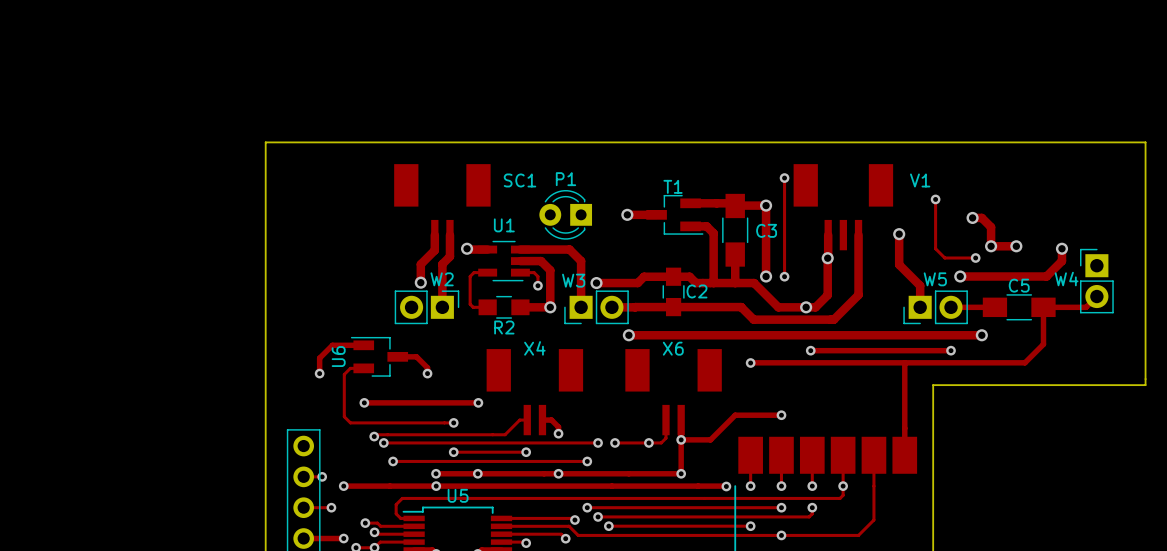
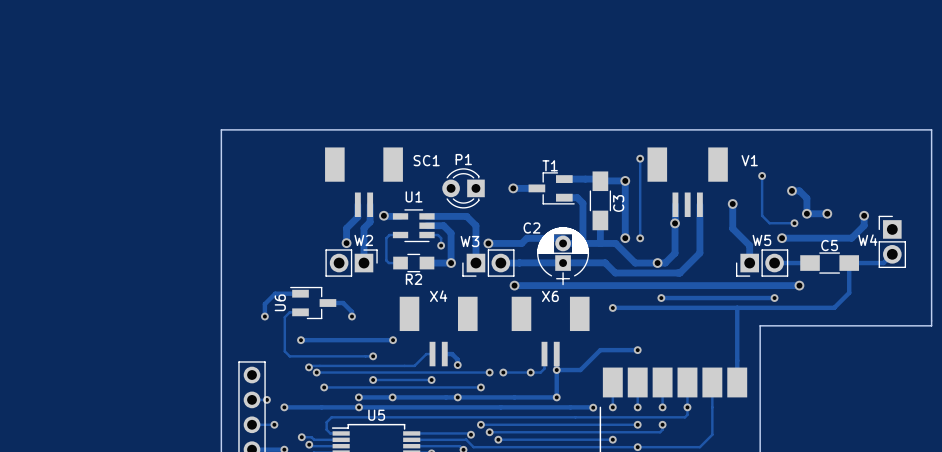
C3 name rotation: 0° (766, 230) -> 90° counterclockwise (618, 203)
C2 footprint: [662, 267, 685, 317] -> [537, 227, 590, 286]
C2 name position: C2 (697, 291) -> C2 (531, 227)

